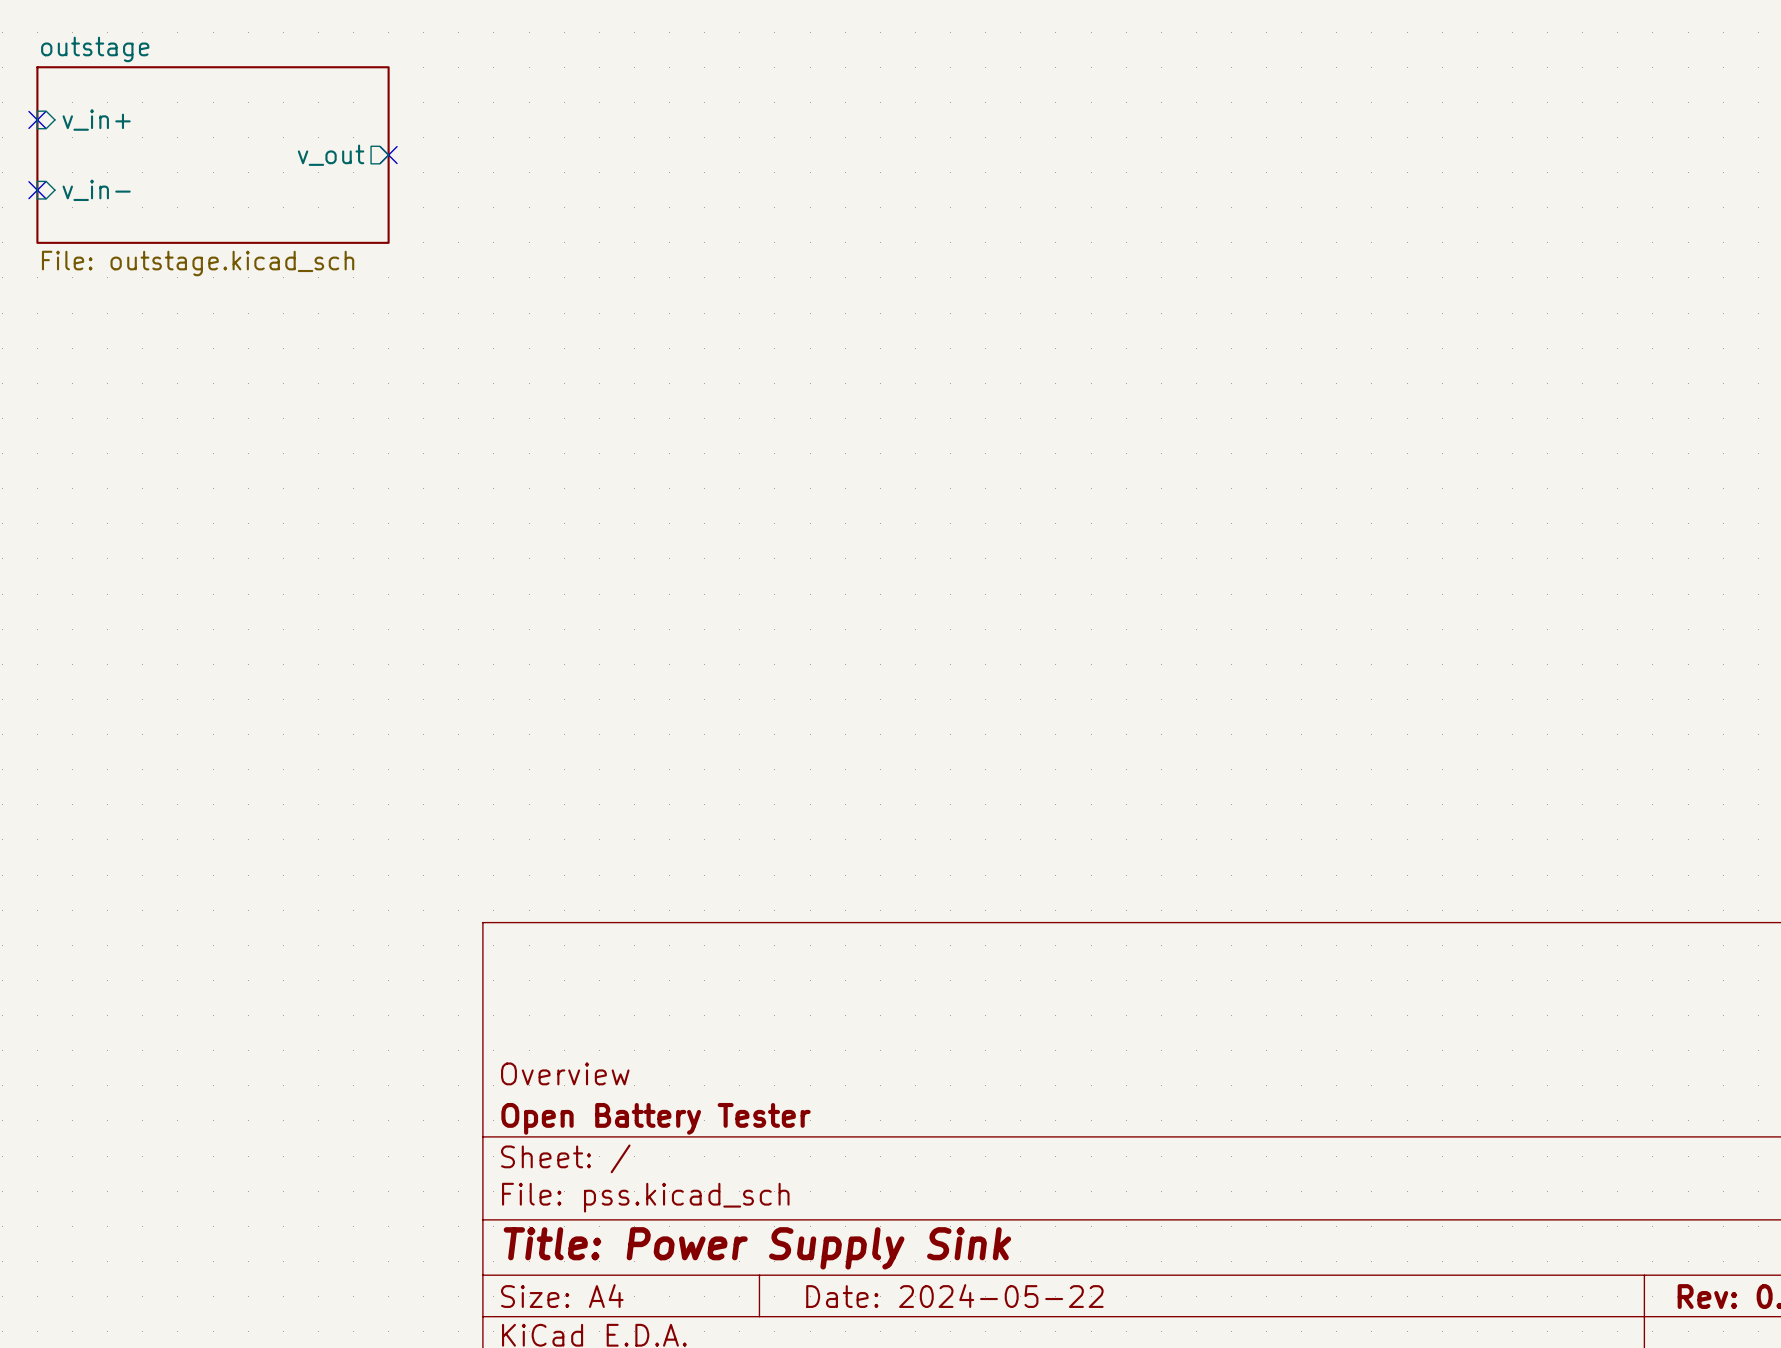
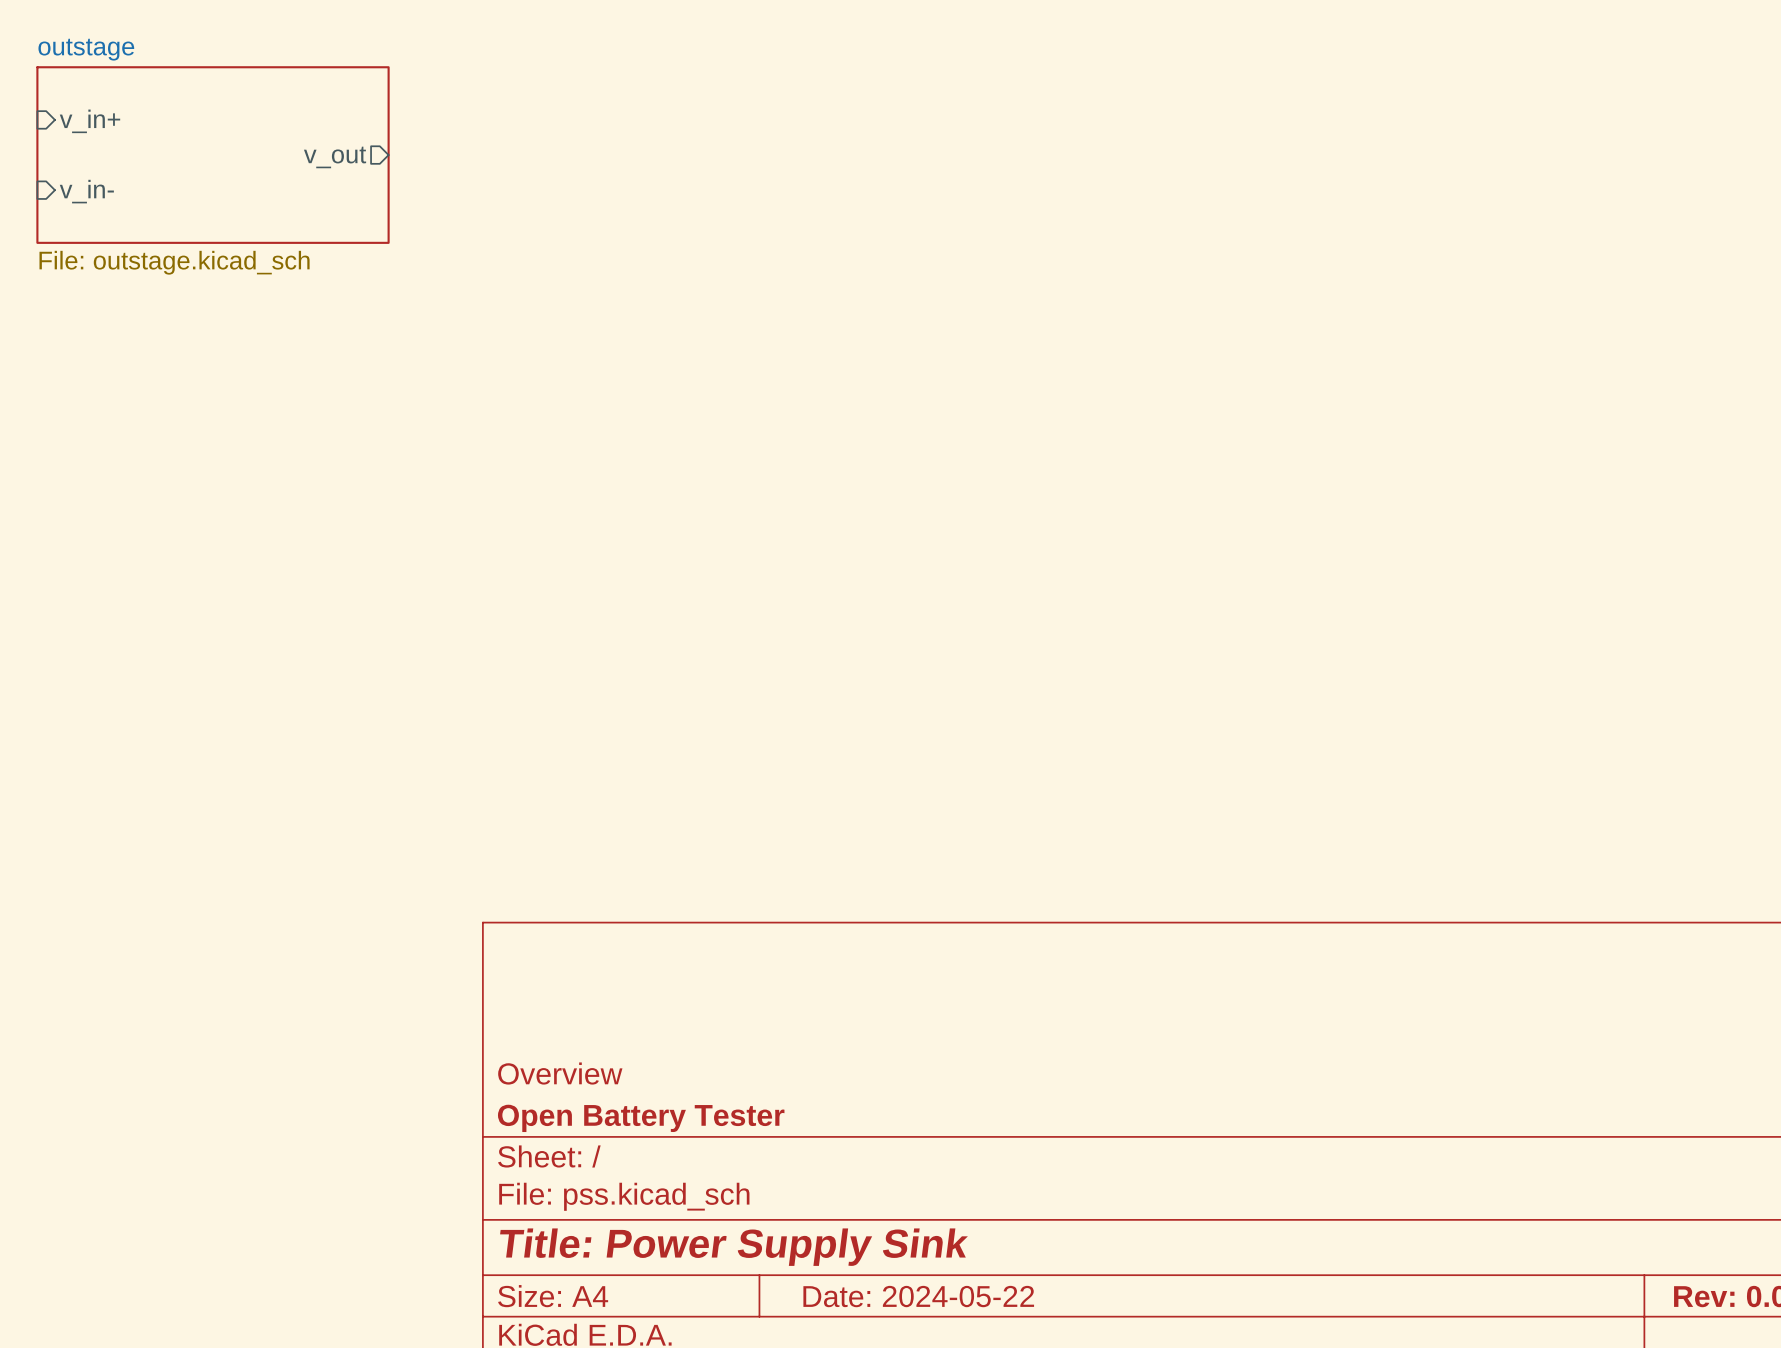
no-connect mark: (37, 119) -> none
no-connect mark: (388, 155) -> none
no-connect mark: (37, 190) -> none

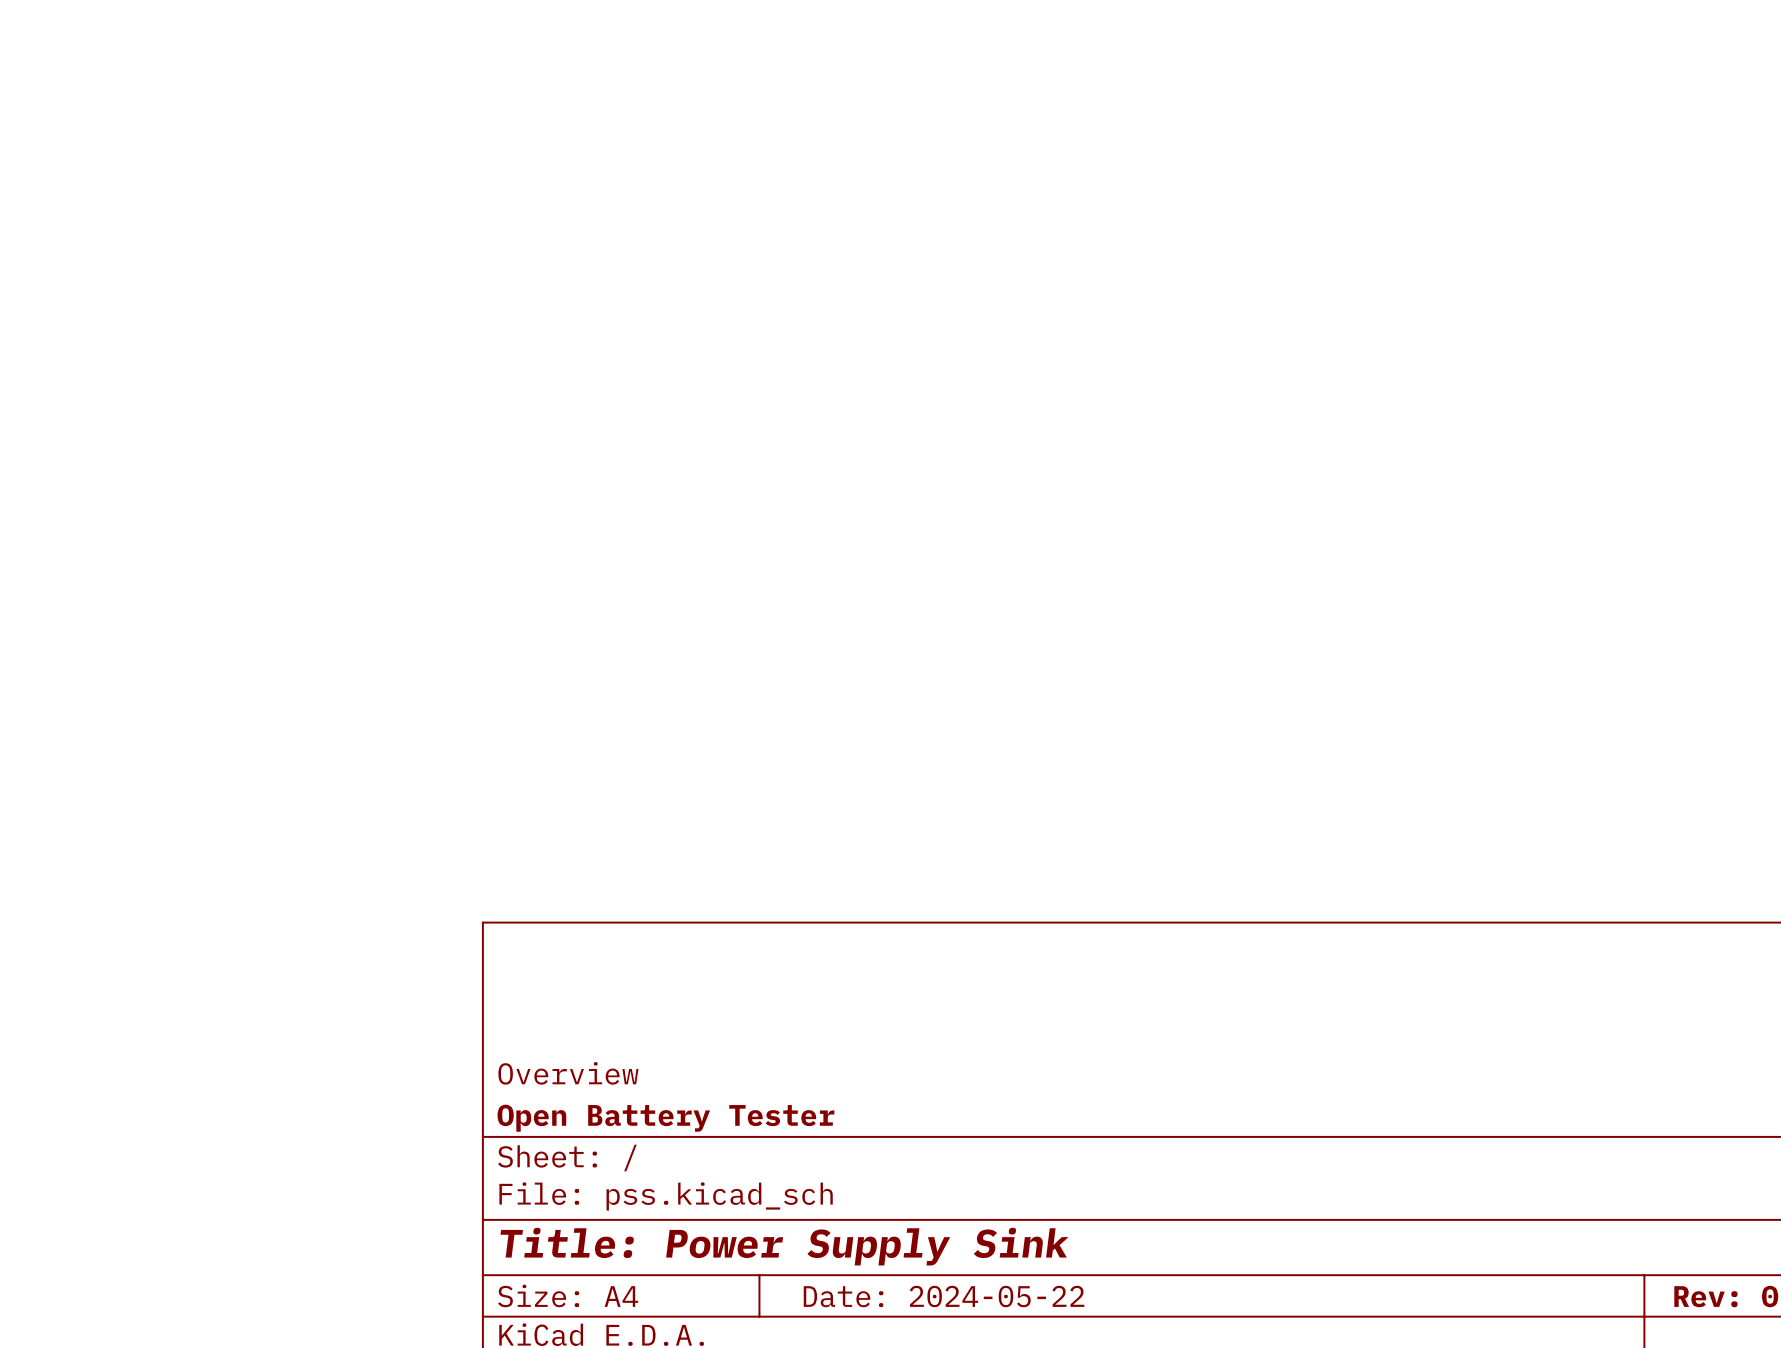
sheet pin: v_in+ (89, 121) -> none
sheet outstage: File: outstage.kicad_sch (213, 155) -> none
sheet pin: v_out (335, 157) -> none
sheet pin: v_in- (86, 191) -> none

